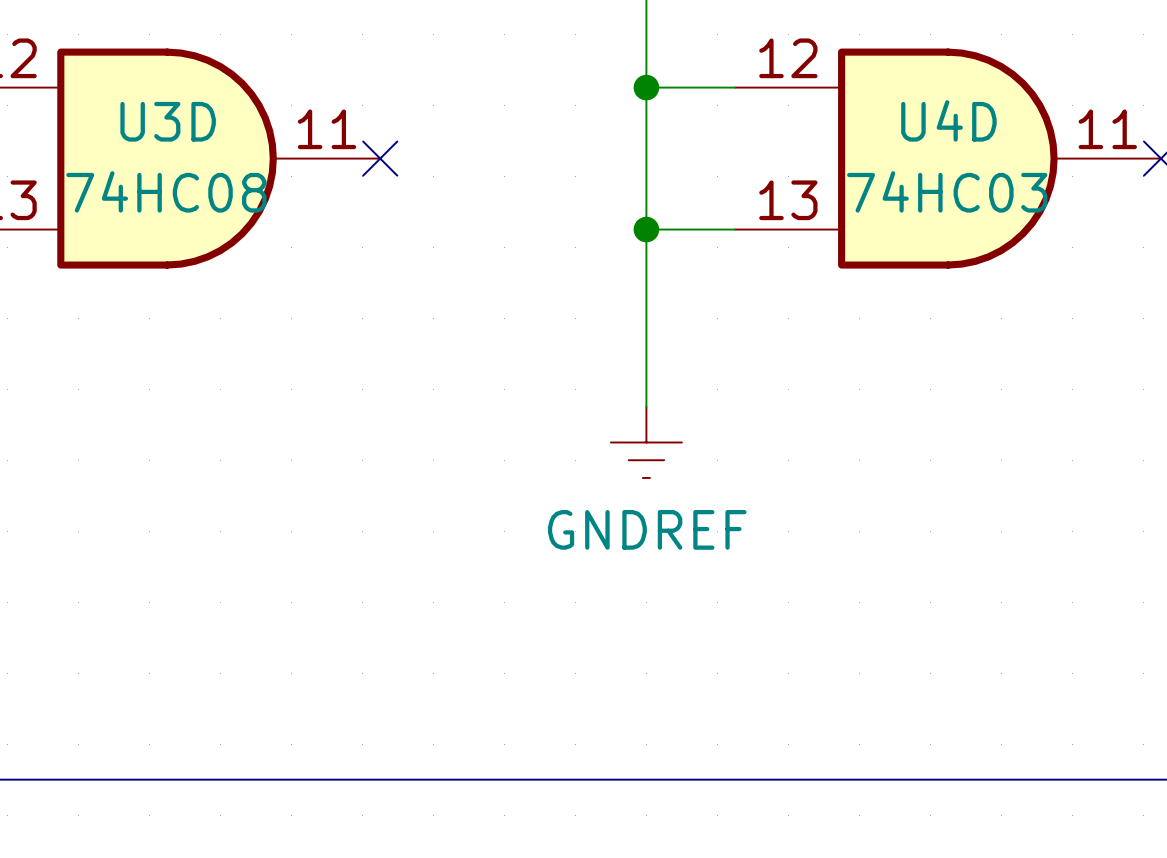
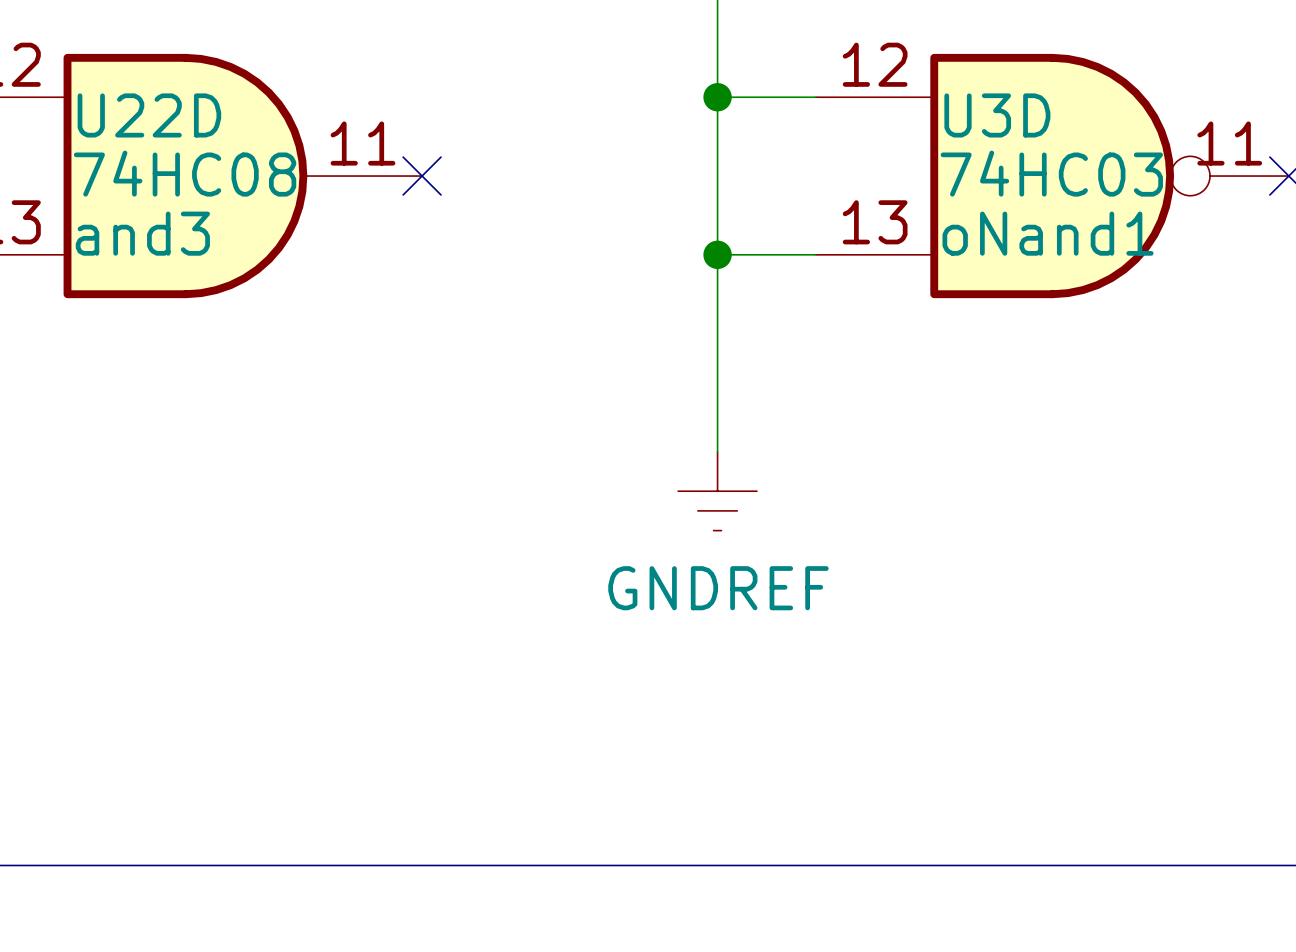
U3D name: U3D (168, 121) -> U22D (149, 115)
U4D: 74HC03 (948, 158) -> none
U3D: none -> 74HC03 (1052, 176)
U3D value position: 74HC08 (166, 191) -> 74HC08 (185, 173)
U3D text: none -> and3 (142, 233)

